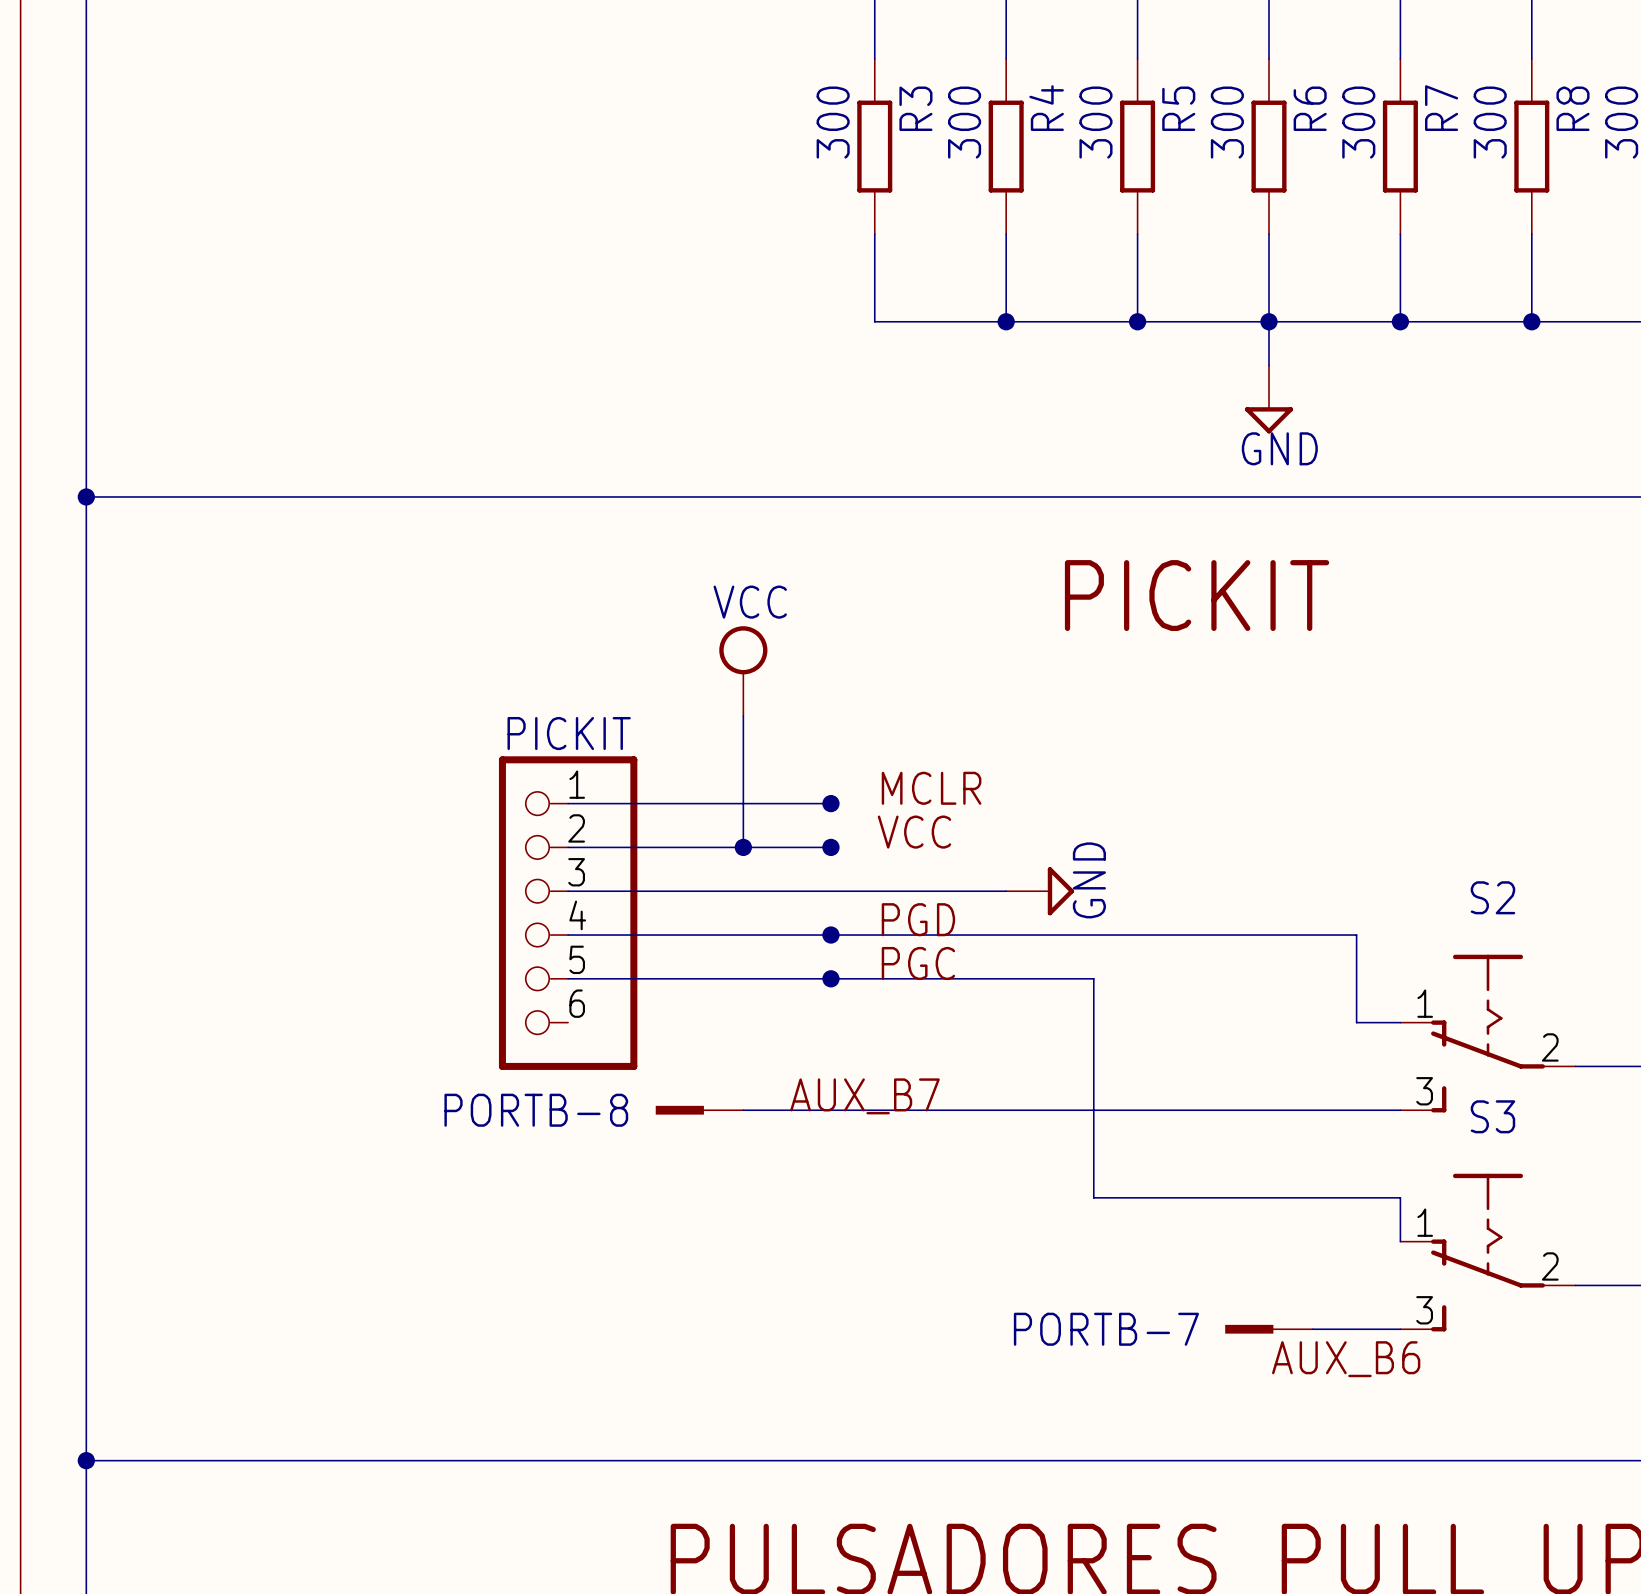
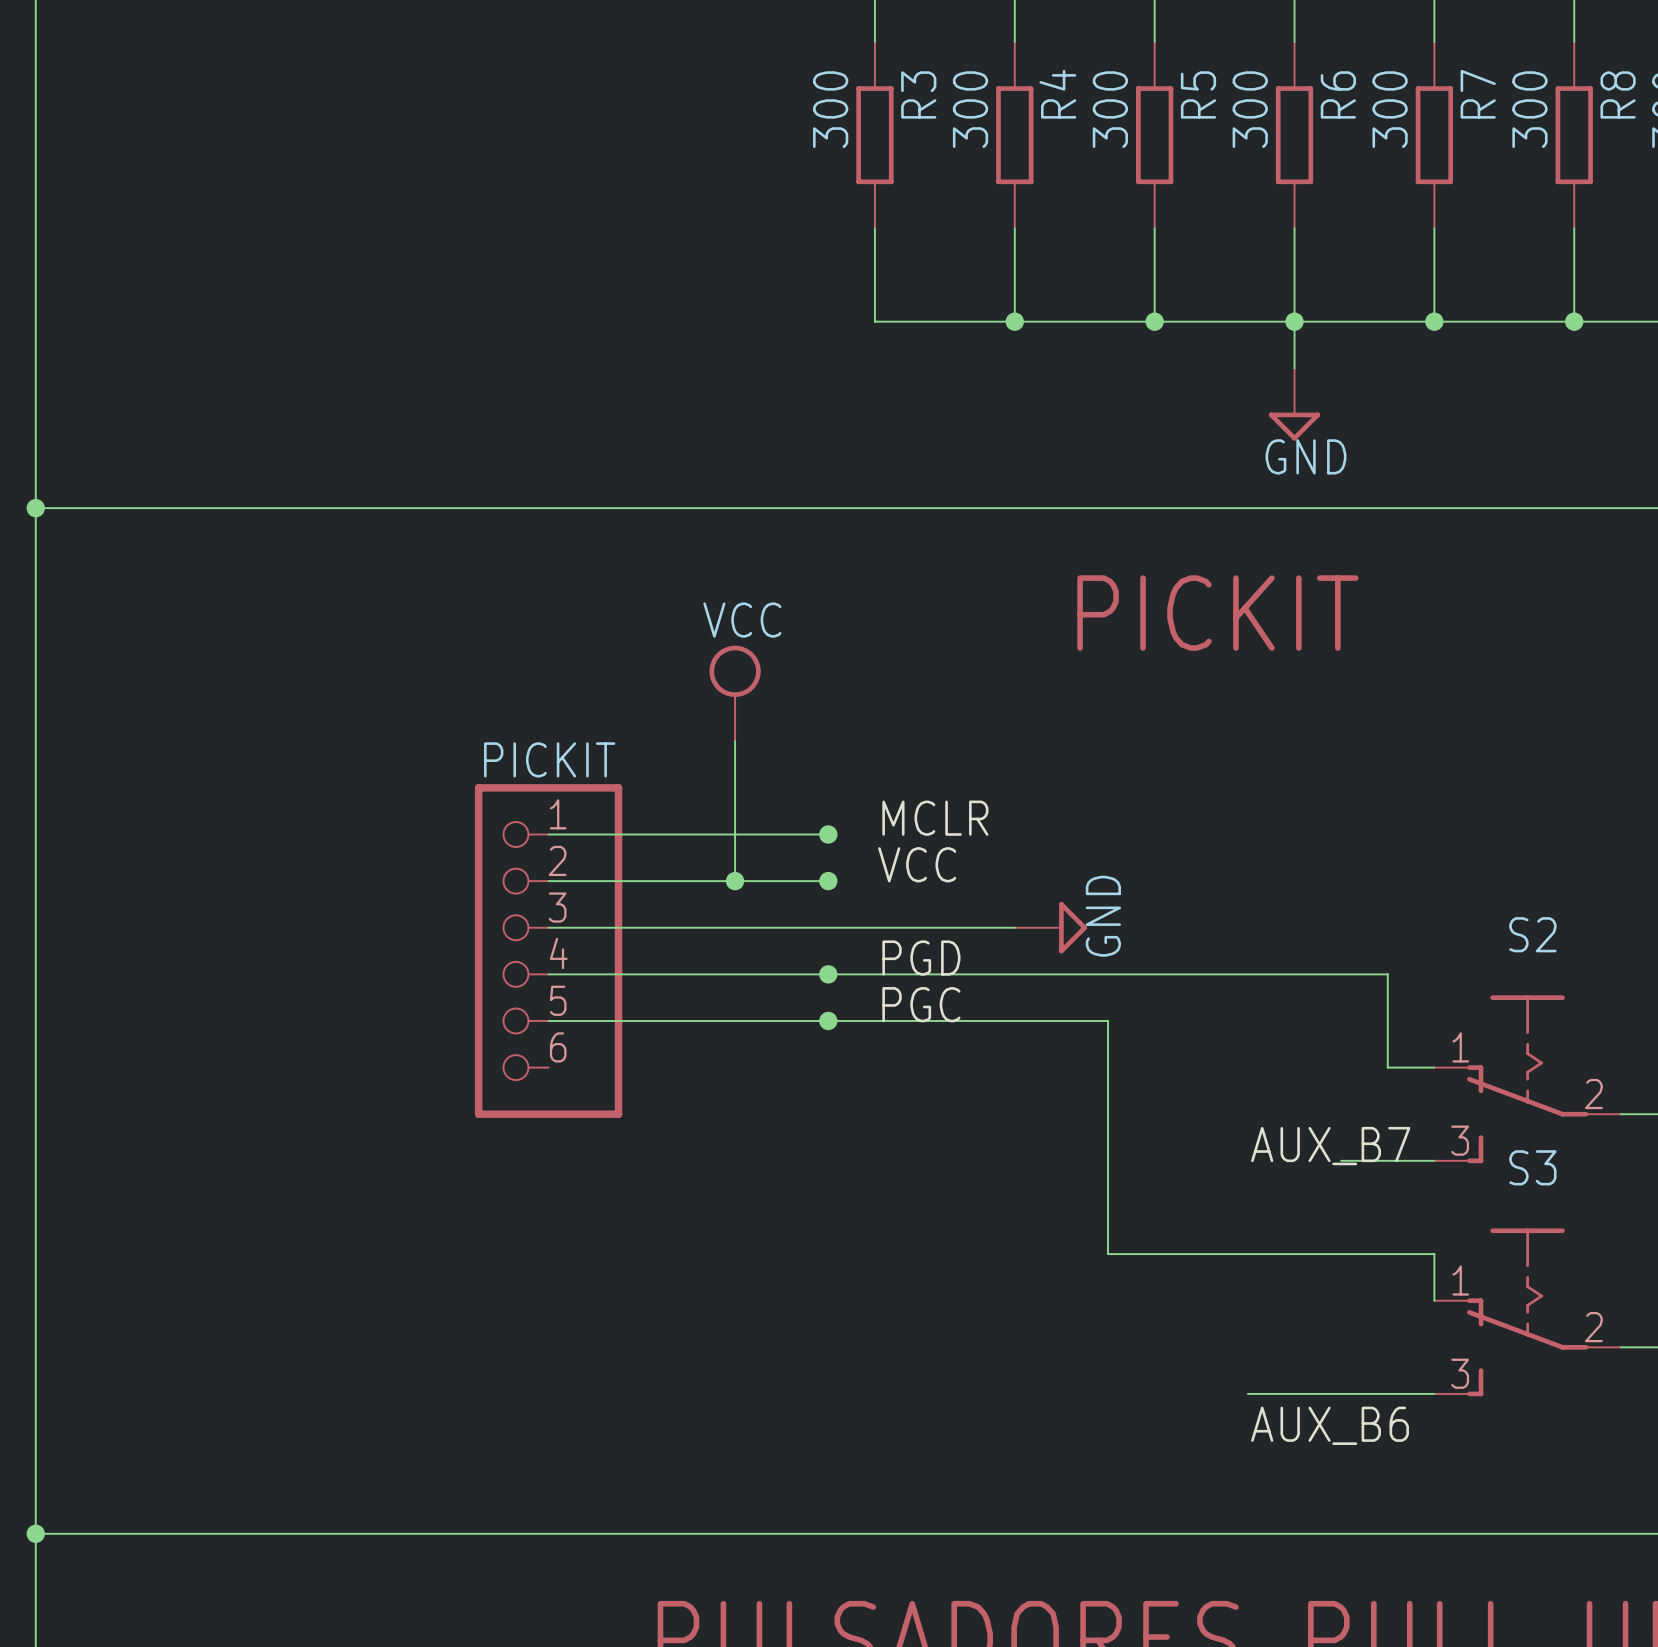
label: AUX_B7 (864, 1096) -> none
label: none -> AUX_B7 (1330, 1146)
PORTB-8: (699, 1110) -> none
wire: (743, 1110) (1312, 1110) -> none
PORTB-7: (1268, 1329) -> none
label position: AUX_B6 (1346, 1359) -> AUX_B6 (1330, 1425)

